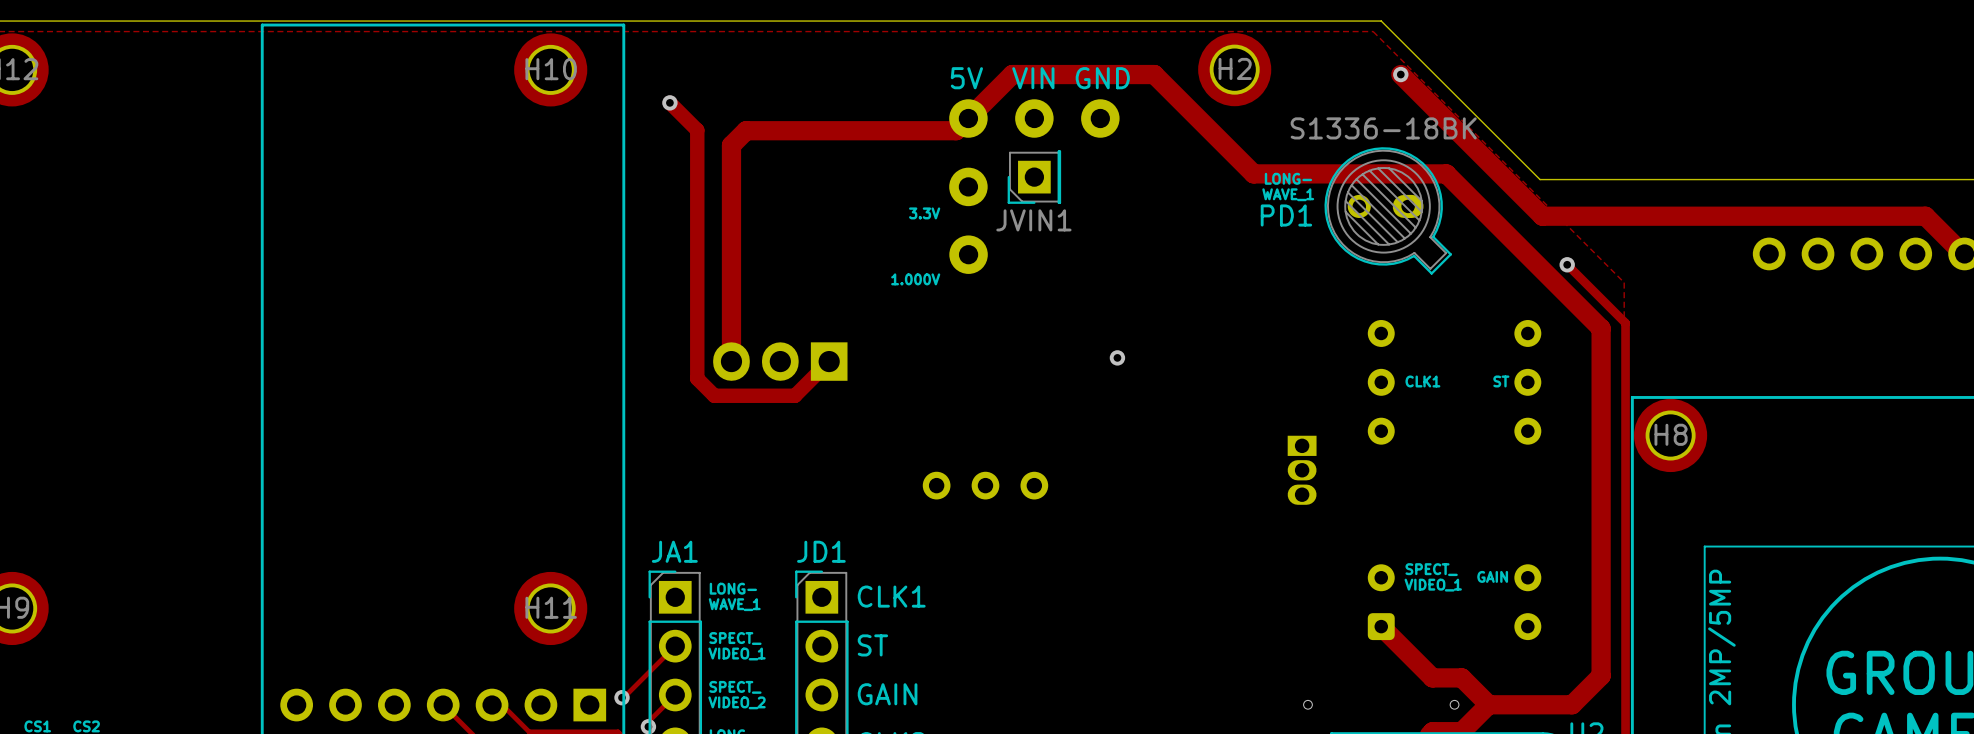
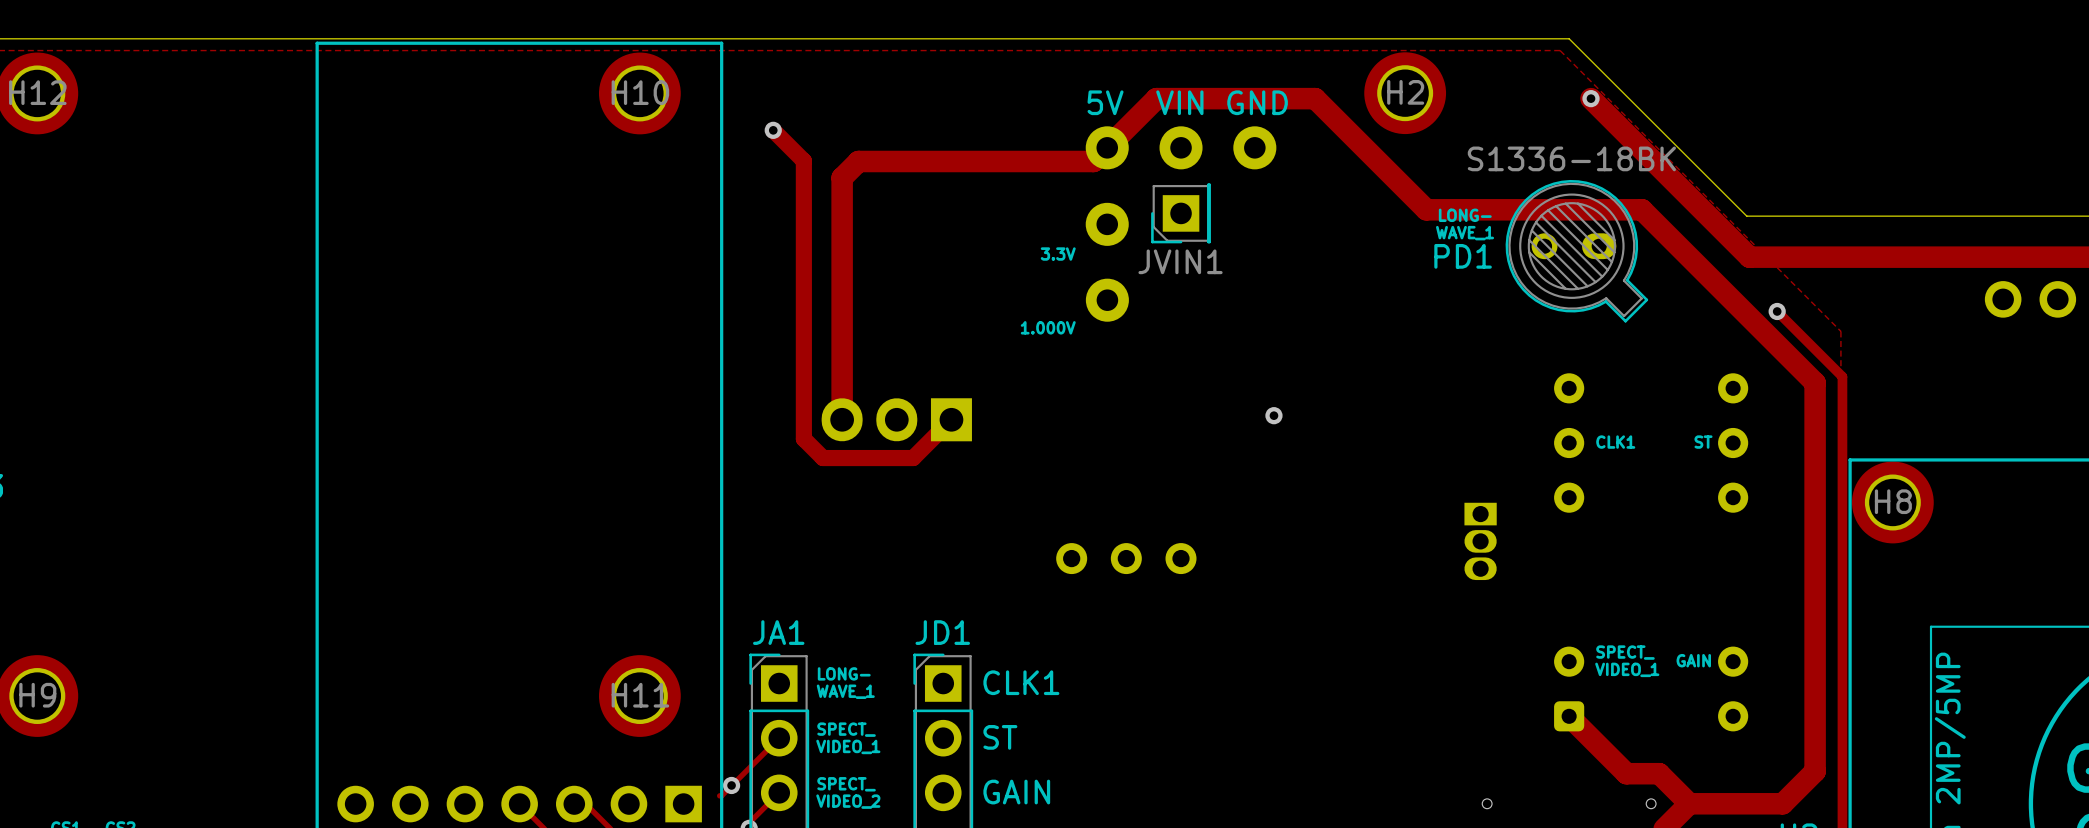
via position: (622, 697) -> (731, 785)

